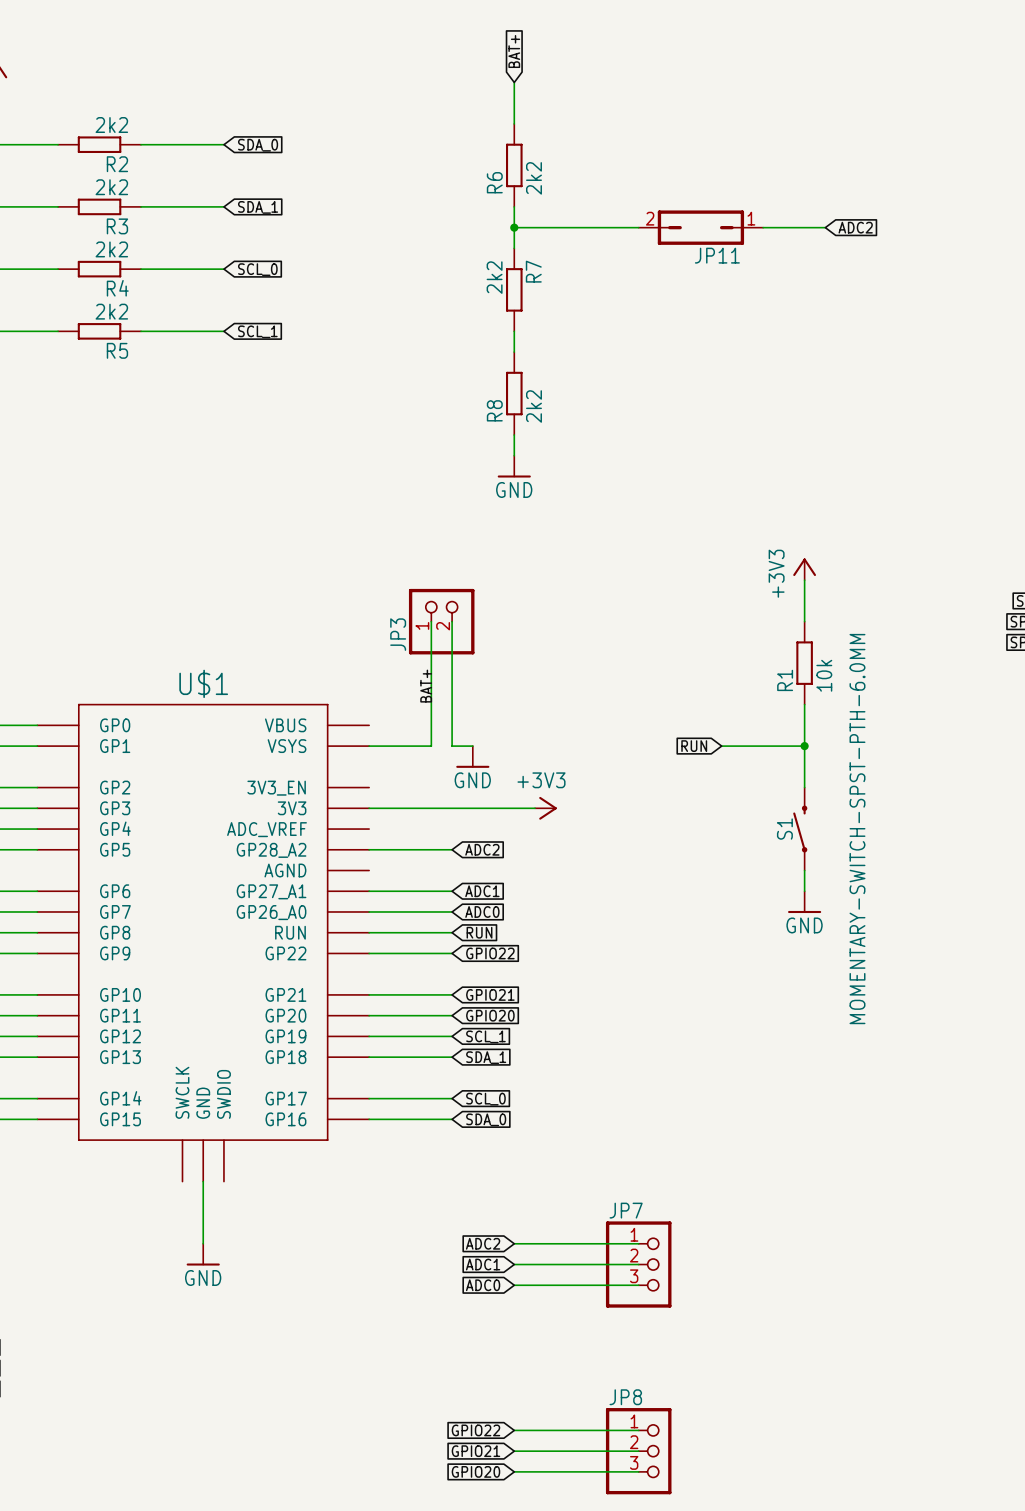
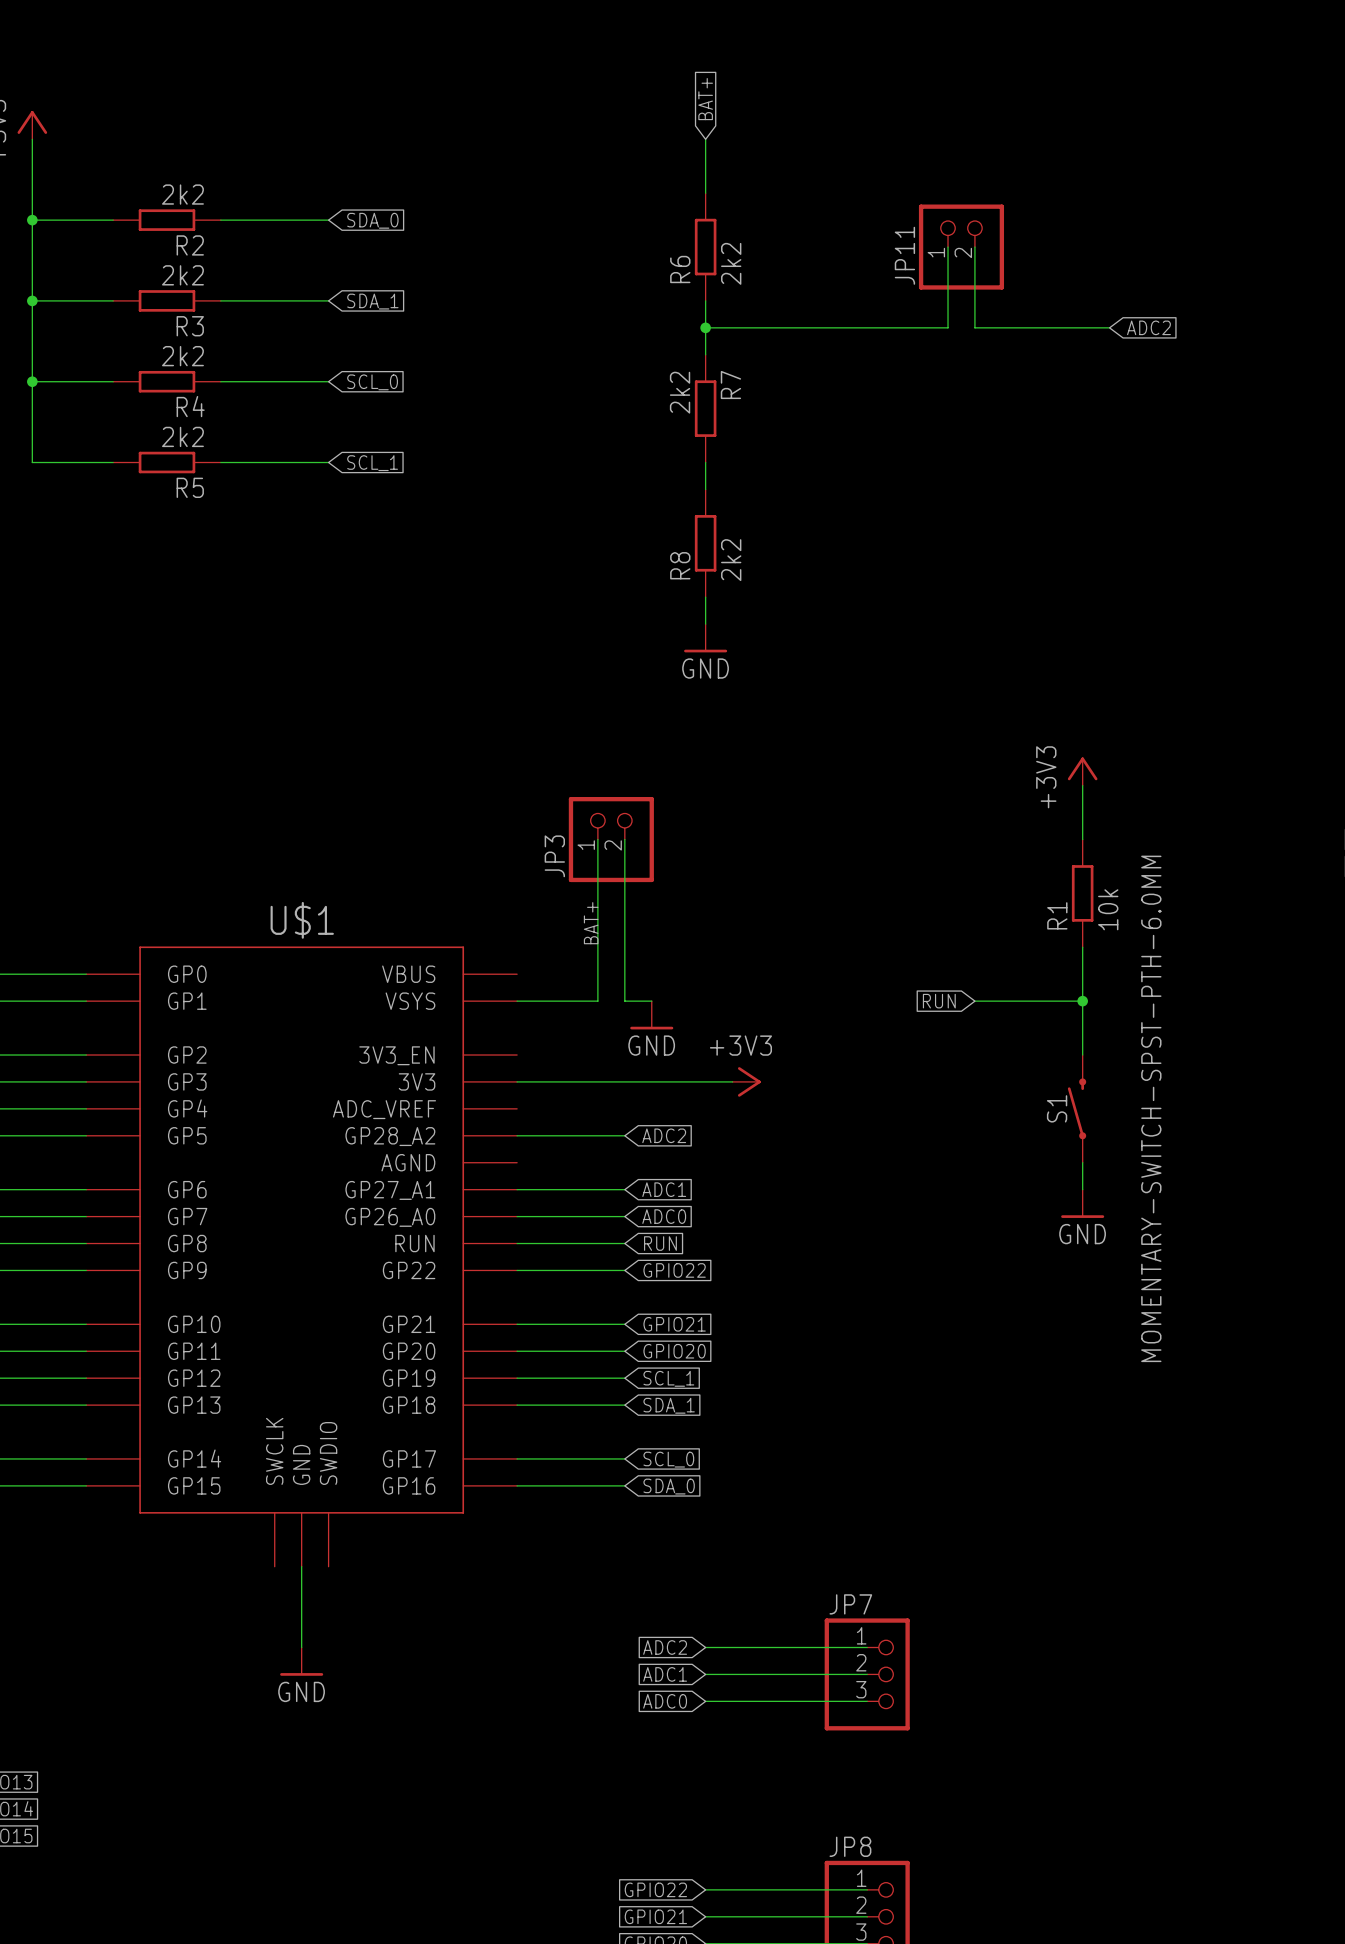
wire: none -> (948, 247) (948, 327) (867, 327)
wire: none -> (974, 247) (974, 327) (1028, 327)
JP11 symbol: [638, 210, 764, 245] -> [918, 204, 1005, 290]
JP11 name position: JP11 (717, 255) -> JP11 (904, 255)

